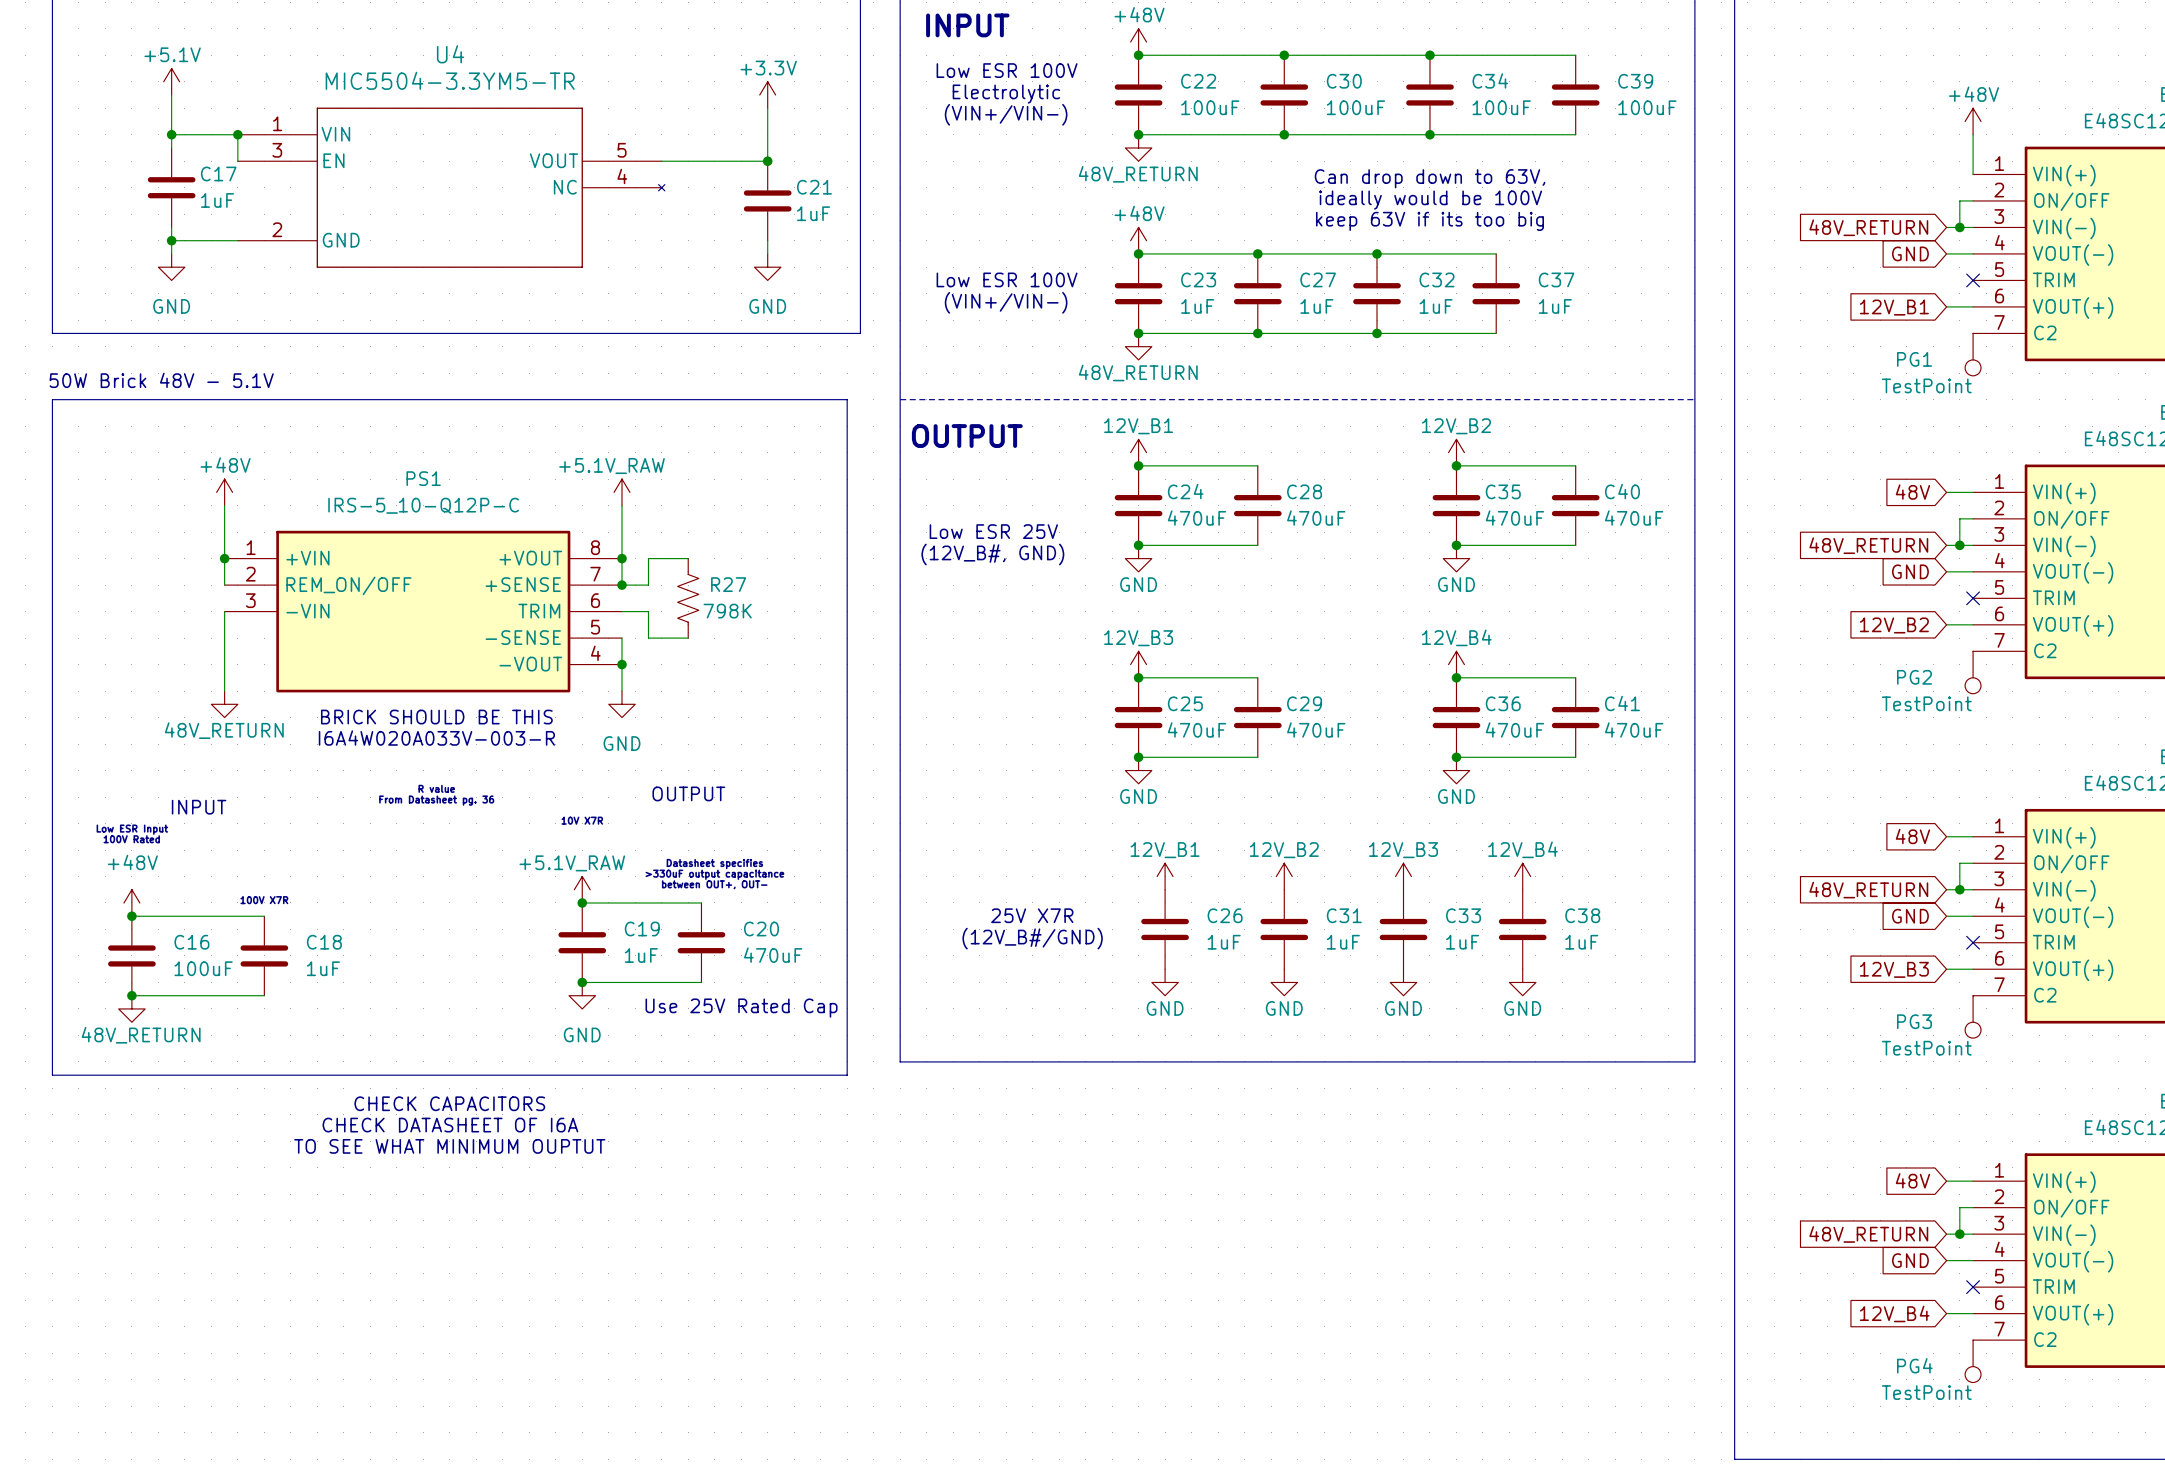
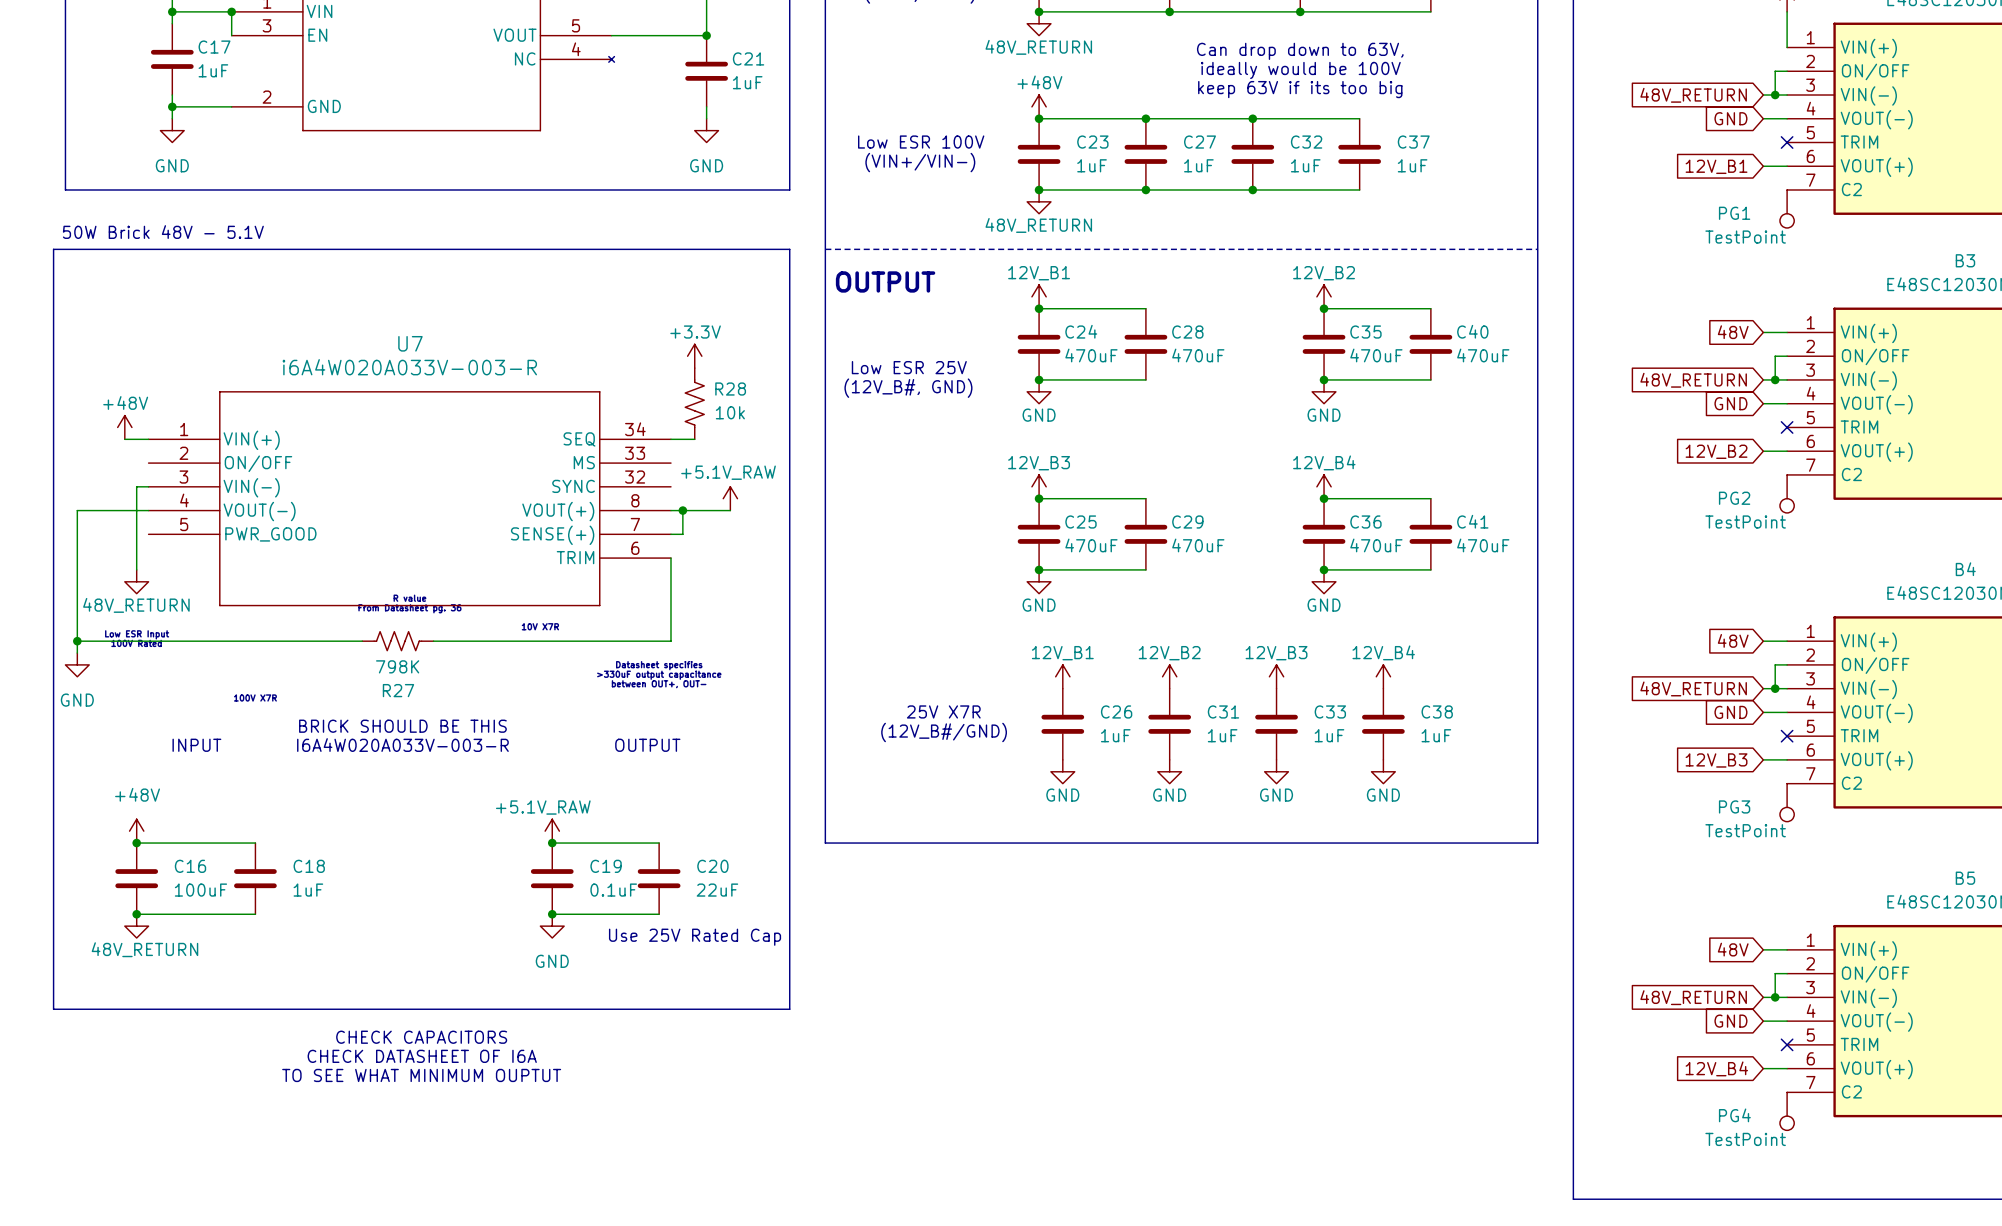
line: (52, 399) (52, 1075) (847, 1075) (847, 399) -> (65, 249) (53, 249) (53, 1009) (789, 1009) (789, 249) (777, 249)
power symbol position: +48V (224, 492) -> +48V (124, 427)
power symbol: +5.1V_RAW (621, 492) -> none
wire: (224, 505) (224, 585) -> none
wire: (621, 505) (621, 585) (648, 585) (648, 558) (688, 558) -> none
power symbol: none -> +3.3V (694, 356)
junction: (224, 558) -> none
junction: (621, 558) -> none
R28: none -> 10k (694, 403)
junction: (621, 585) -> none
R27 rotation: 0° (688, 598) -> 90° clockwise (397, 641)
R27 position: (688, 598) -> (397, 641)
wire: none -> (124, 439) (148, 439)
PS1: IRS-5_10-Q12P-C (423, 611) -> none
wire: none -> (670, 439) (694, 439)
wire: (621, 638) (621, 691) -> none
wire: none -> (148, 486) (136, 486) (136, 569)
junction: (621, 664) -> none
U7: none -> i6A4W020A033V-003-R (409, 498)
power symbol: none -> +5.1V_RAW (730, 498)
wire: none -> (148, 510) (77, 510) (77, 653)
wire: none -> (670, 510) (730, 510)
wire: none -> (682, 510) (682, 534) (670, 534)
junction: none -> (682, 510)
power symbol position: 48V_RETURN (224, 704) -> 48V_RETURN (136, 581)
power symbol: GND (621, 704) -> none
text position: BRICK SHOULD BE THIS (436, 717) -> BRICK SHOULD BE THIS (402, 726)
text position: I6A4W020A033V-003-R (436, 738) -> I6A4W020A033V-003-R (402, 745)
wire: none -> (670, 558) (670, 641) (433, 641)
text position: OUTPUT (688, 793) -> OUTPUT (647, 745)
text position: INPUT (199, 807) -> INPUT (196, 745)
wire: none -> (77, 641) (362, 641)
junction: none -> (77, 641)
power symbol: none -> GND (77, 664)
power symbol: +5.1V_RAW (582, 889) -> none
power symbol position: +48V (131, 902) -> +48V (136, 831)
wire: (582, 902) (701, 902) -> (552, 843) (659, 843)
junction: (582, 902) -> none
wire: (131, 916) (264, 916) -> (136, 843) (255, 843)
junction: (131, 916) -> none
C19 position: (582, 942) -> (552, 878)
C20 position: (701, 942) -> (659, 878)
C16 position: (131, 955) -> (136, 878)
C18 position: (264, 955) -> (255, 878)
C19 value: 1uF (641, 955) -> 0.1uF (613, 890)
C20 value: 470uF (773, 955) -> 22uF (717, 890)
wire: (582, 982) (701, 982) -> (552, 914) (659, 914)
junction: (582, 982) -> none
wire: (131, 995) (264, 995) -> (136, 914) (255, 914)
junction: (131, 995) -> none
power symbol position: GND (582, 995) -> GND (552, 926)
power symbol: 48V_RETURN (131, 1008) -> none
text position: Use 25V Rated Cap (741, 1008) -> Use 25V Rated Cap (695, 937)
power symbol: none -> +5.1V_RAW (552, 831)
junction: none -> (136, 843)
junction: none -> (552, 843)
text position: CHECK CAPACITORS (449, 1103) -> CHECK CAPACITORS (421, 1037)
text position: CHECK DATASHEET OF I6A (450, 1125) -> CHECK DATASHEET OF I6A (422, 1056)
junction: none -> (136, 914)
junction: none -> (552, 914)
text position: TO SEE WHAT MINIMUM OUPTUT (449, 1146) -> TO SEE WHAT MINIMUM OUPTUT (421, 1075)
power symbol: none -> 48V_RETURN (136, 926)

